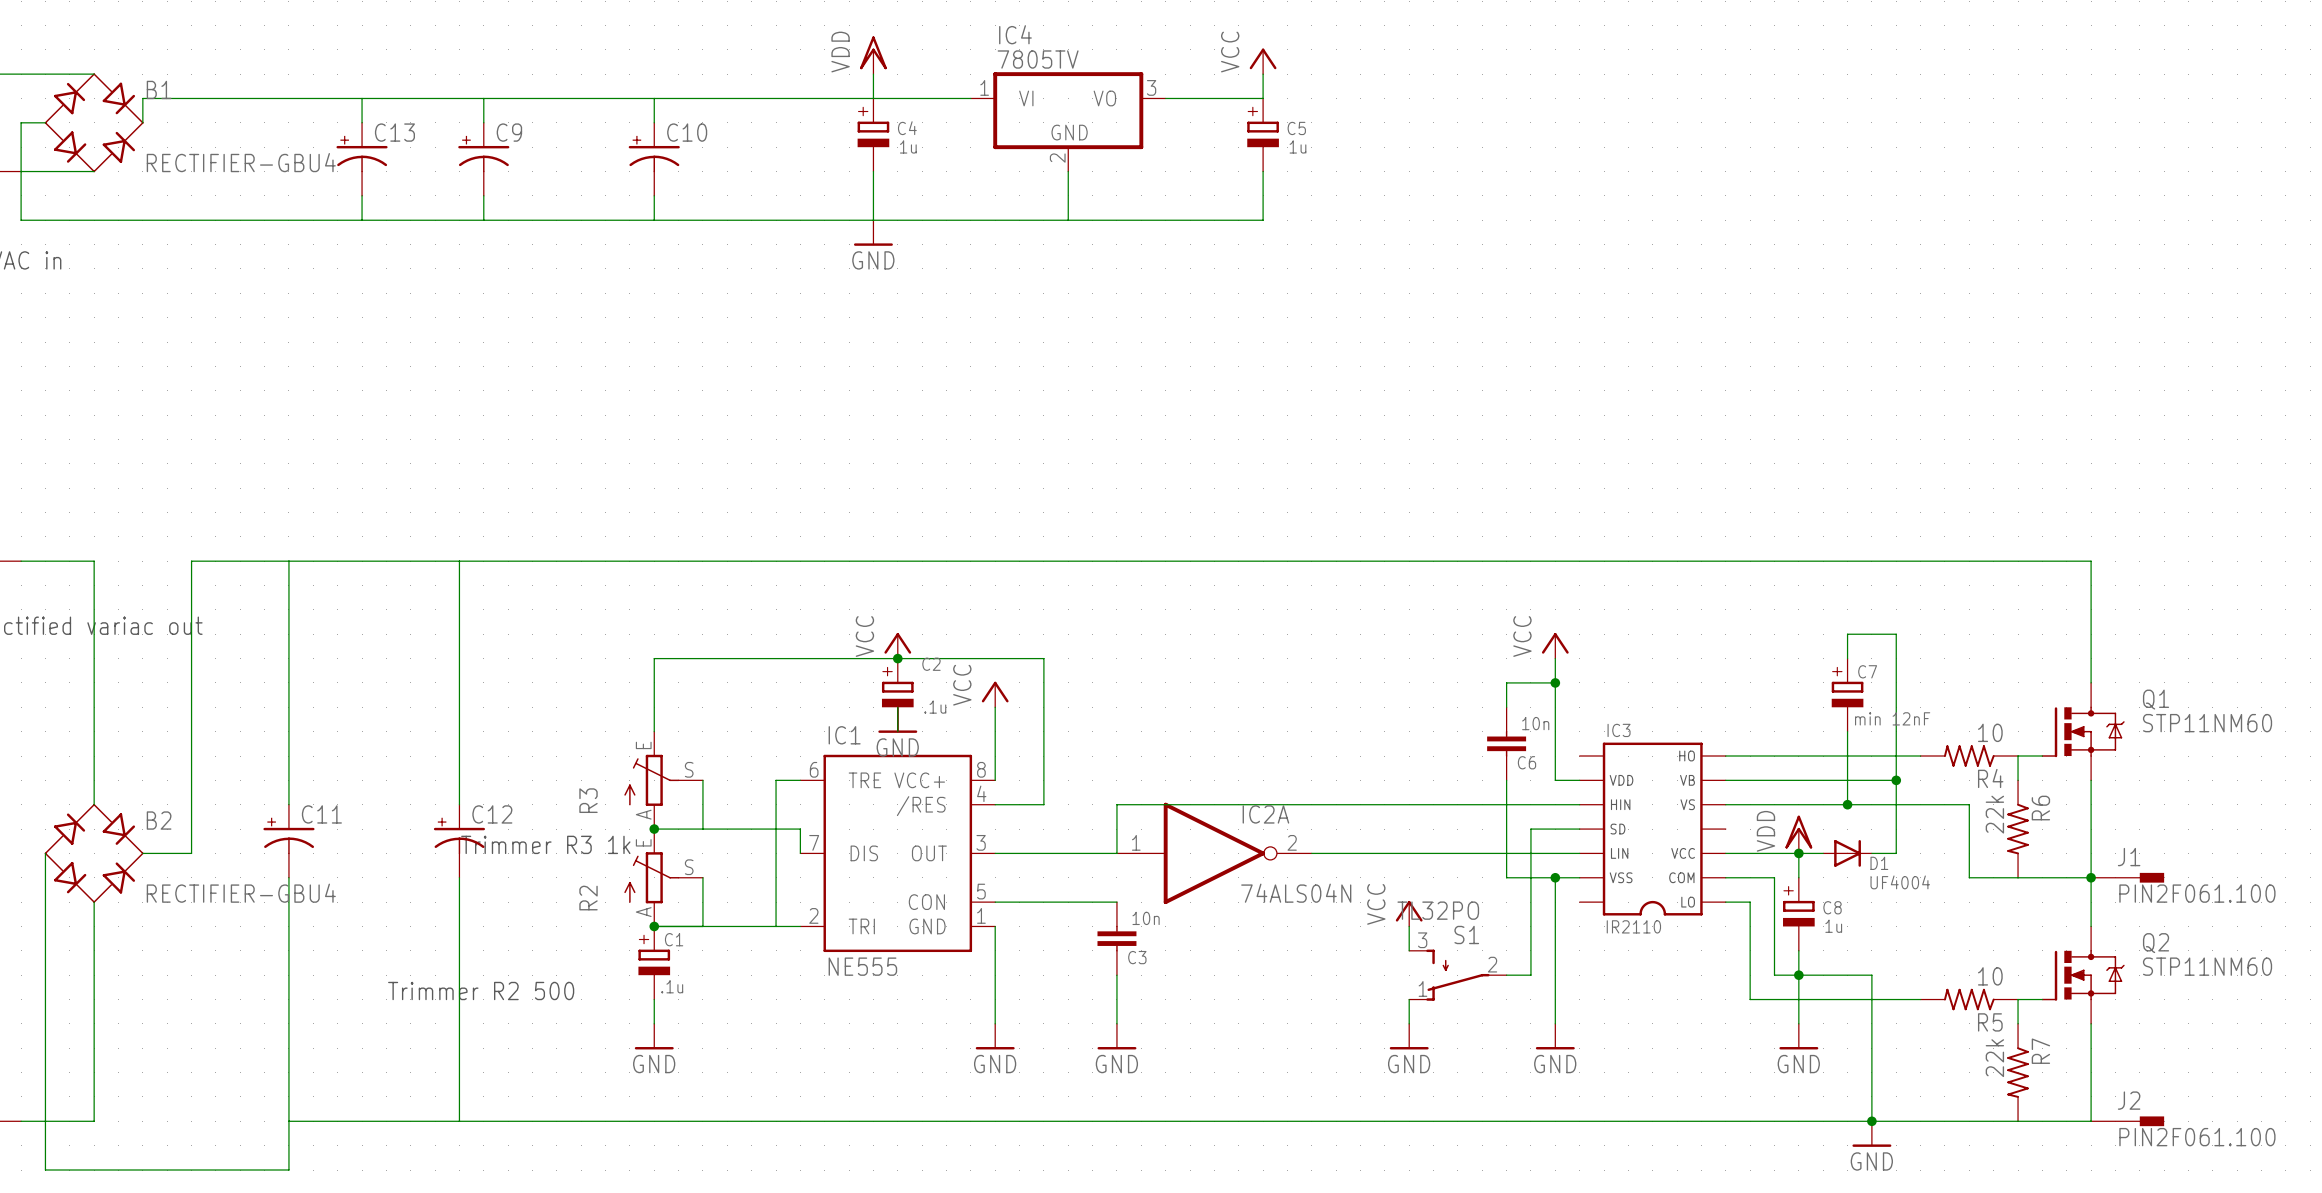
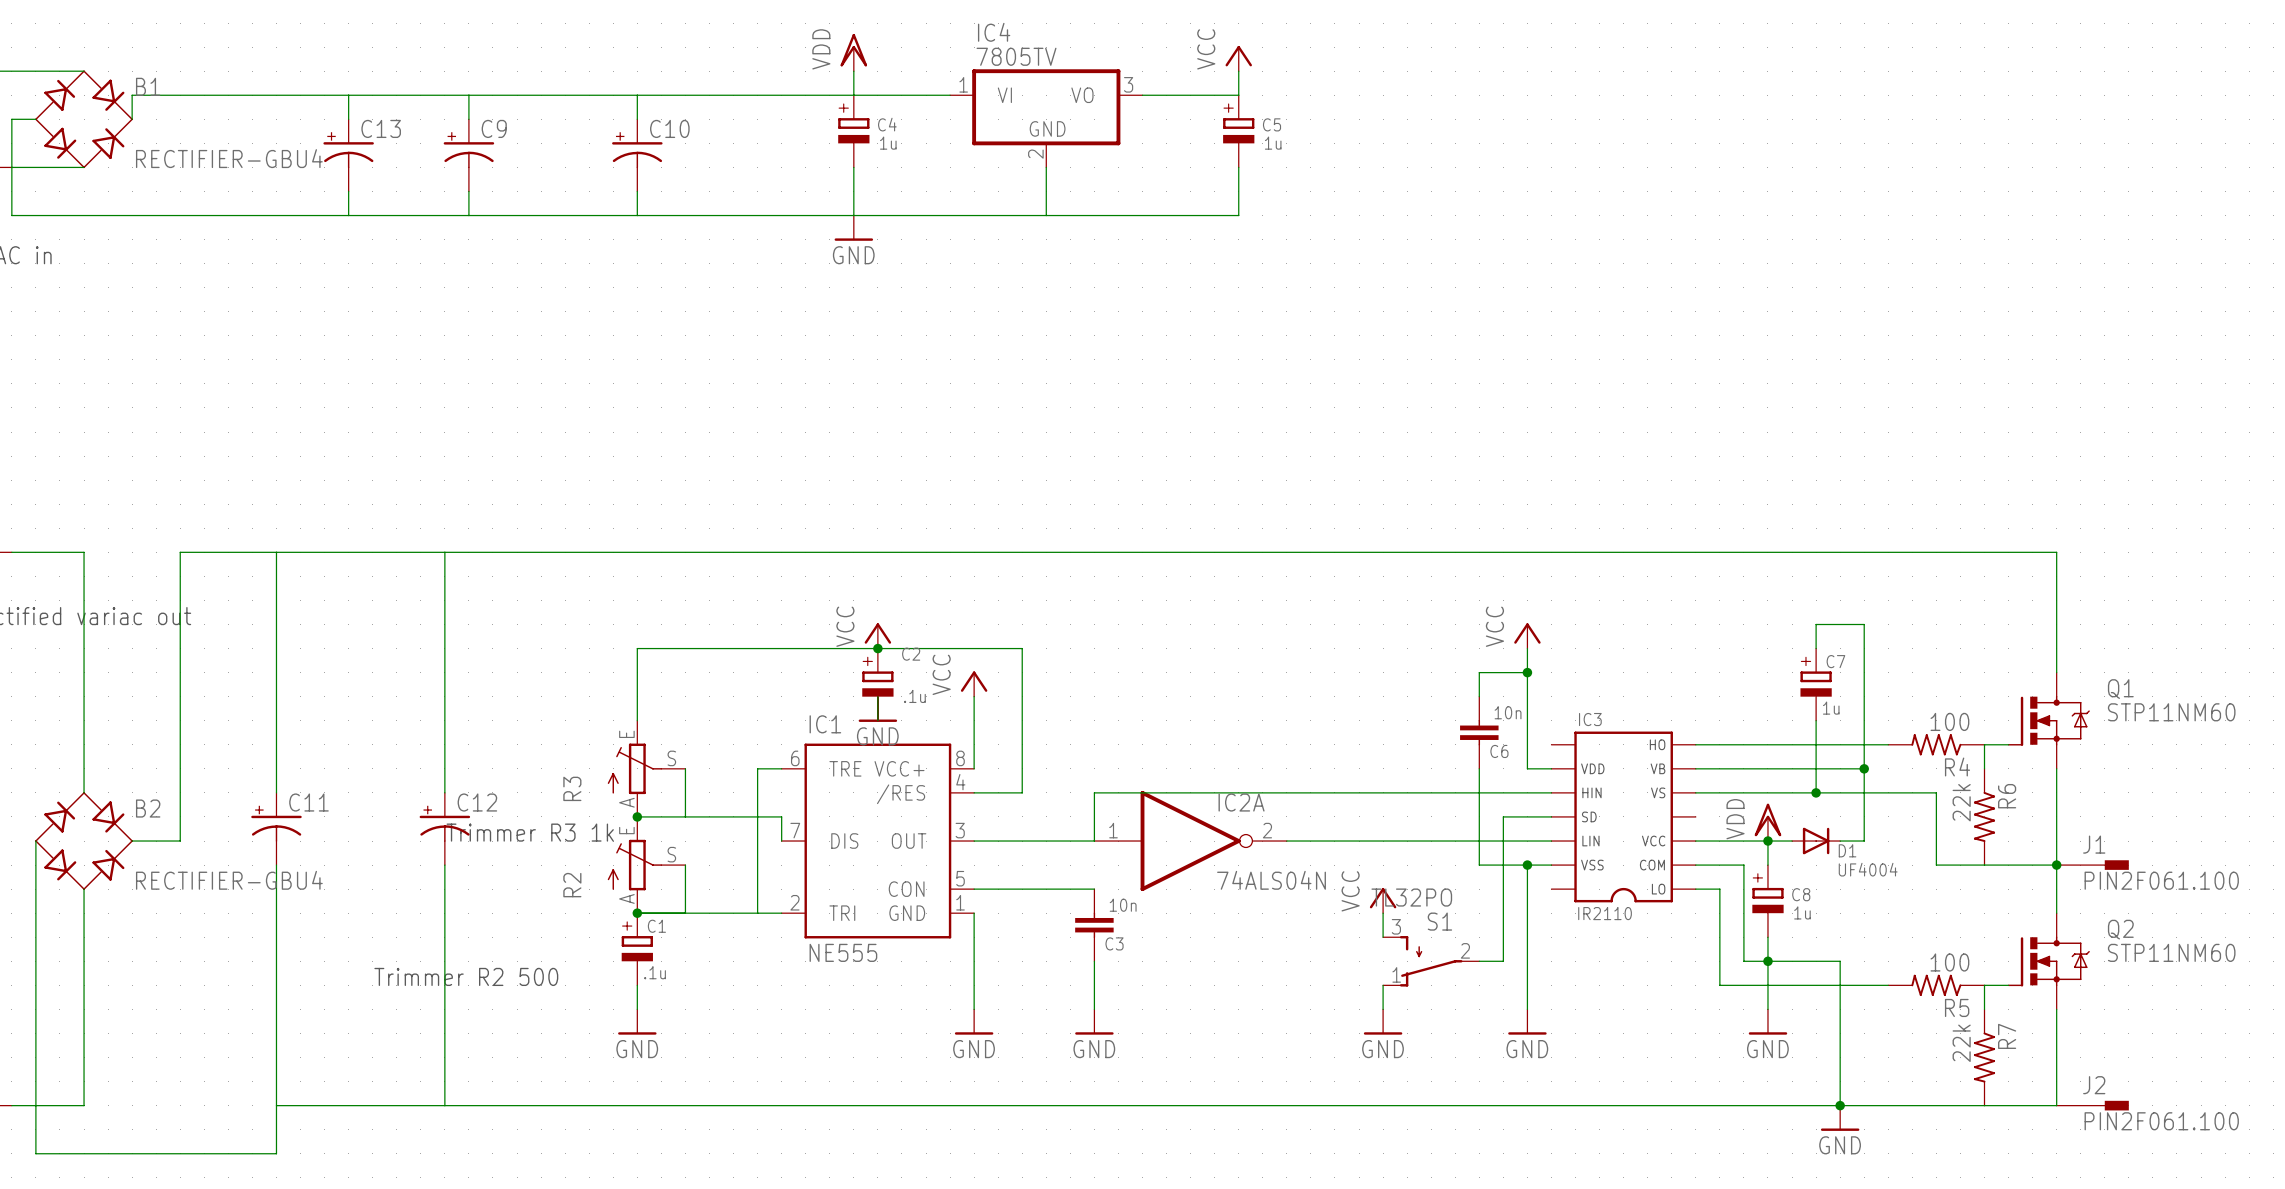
C7 value: min 12nF (1892, 718) -> 1u (1831, 708)
R4 value: 10 (1990, 732) -> 100 (1949, 721)
R5 value: 10 (1990, 976) -> 100 (1949, 962)

